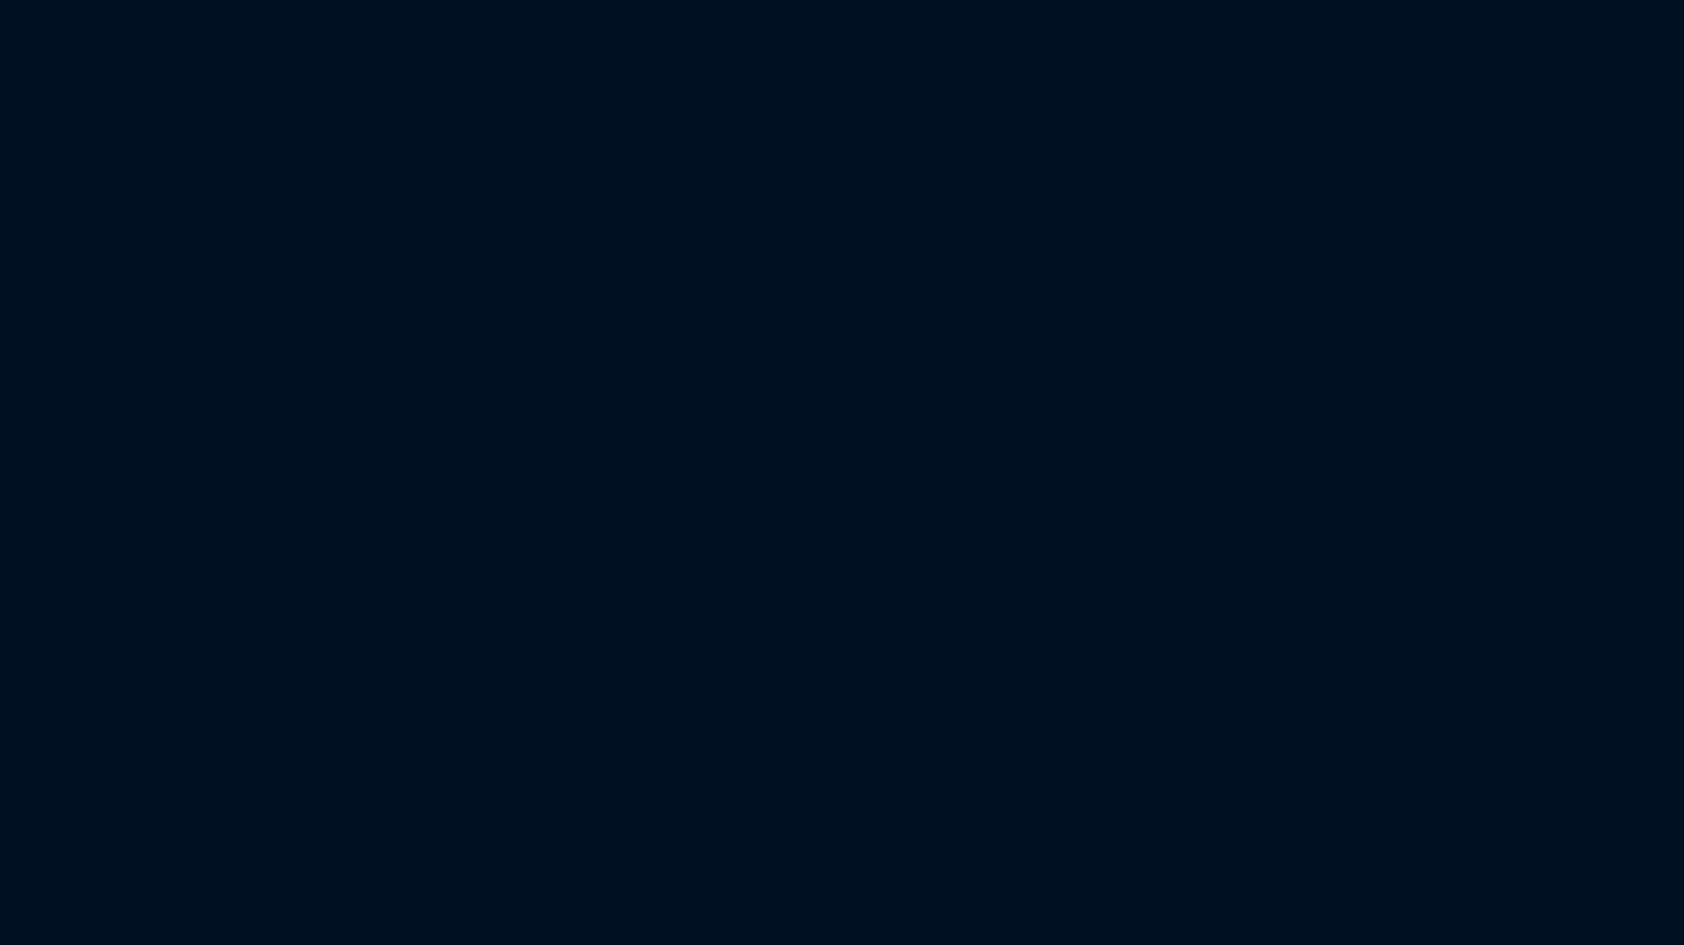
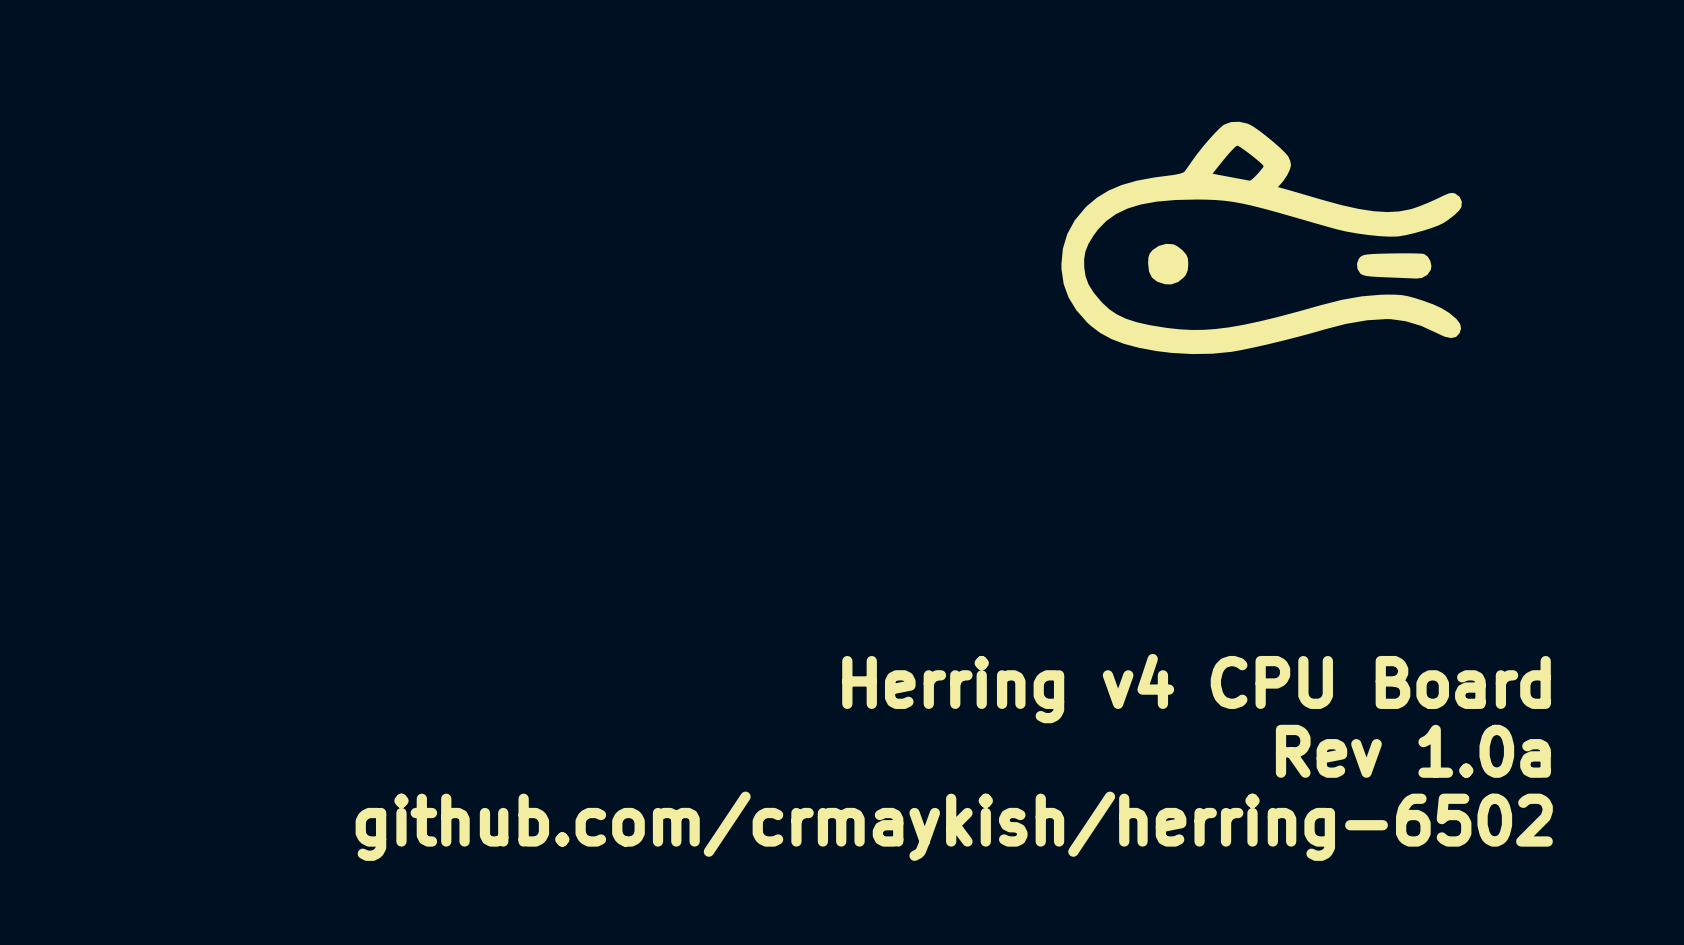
drawing: none -> [1061, 121, 1462, 355]
text: none -> Herring v4 CPU Board (1196, 688)
text: none -> Rev 1.0a (1413, 751)
text: none -> github.com/crmaykish/herring-6502 (954, 826)

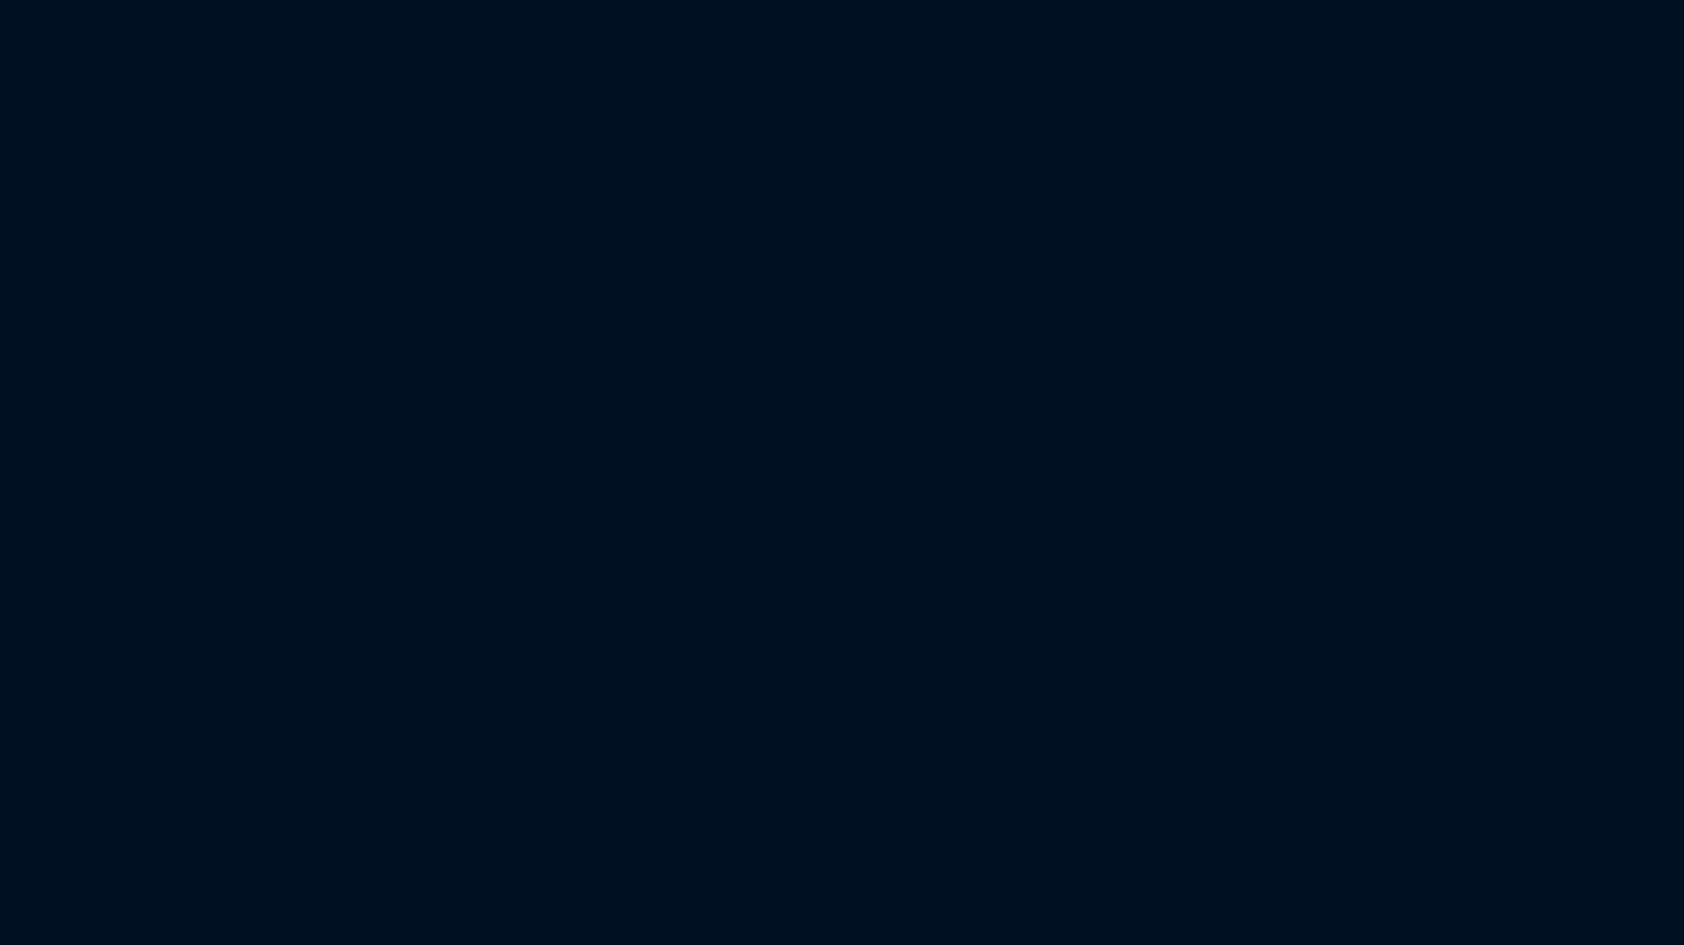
drawing: [1061, 121, 1462, 355] -> none
text: Herring v4 CPU Board (1196, 688) -> none
text: Rev 1.0a (1413, 751) -> none
text: github.com/crmaykish/herring-6502 (954, 826) -> none

